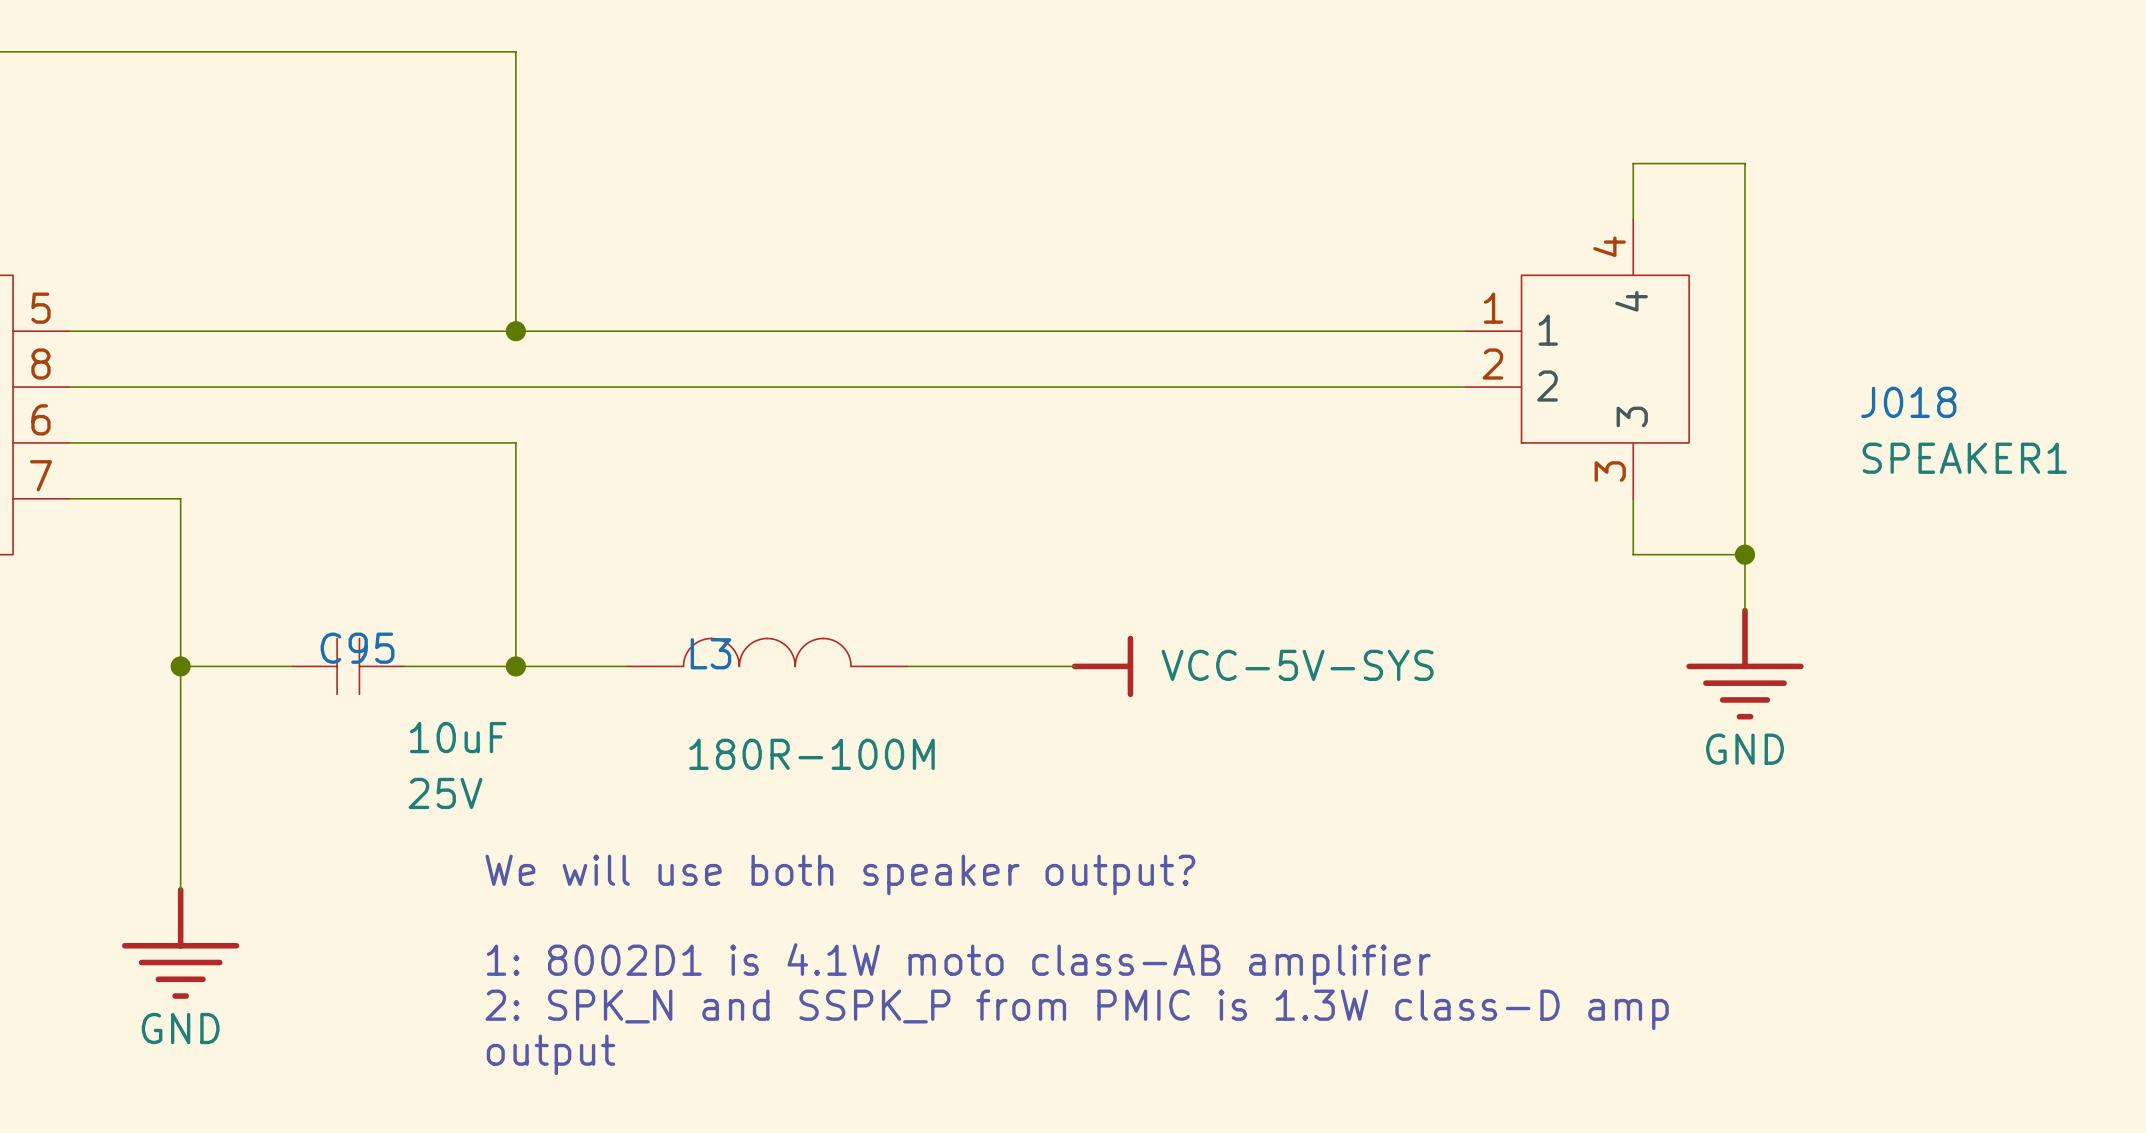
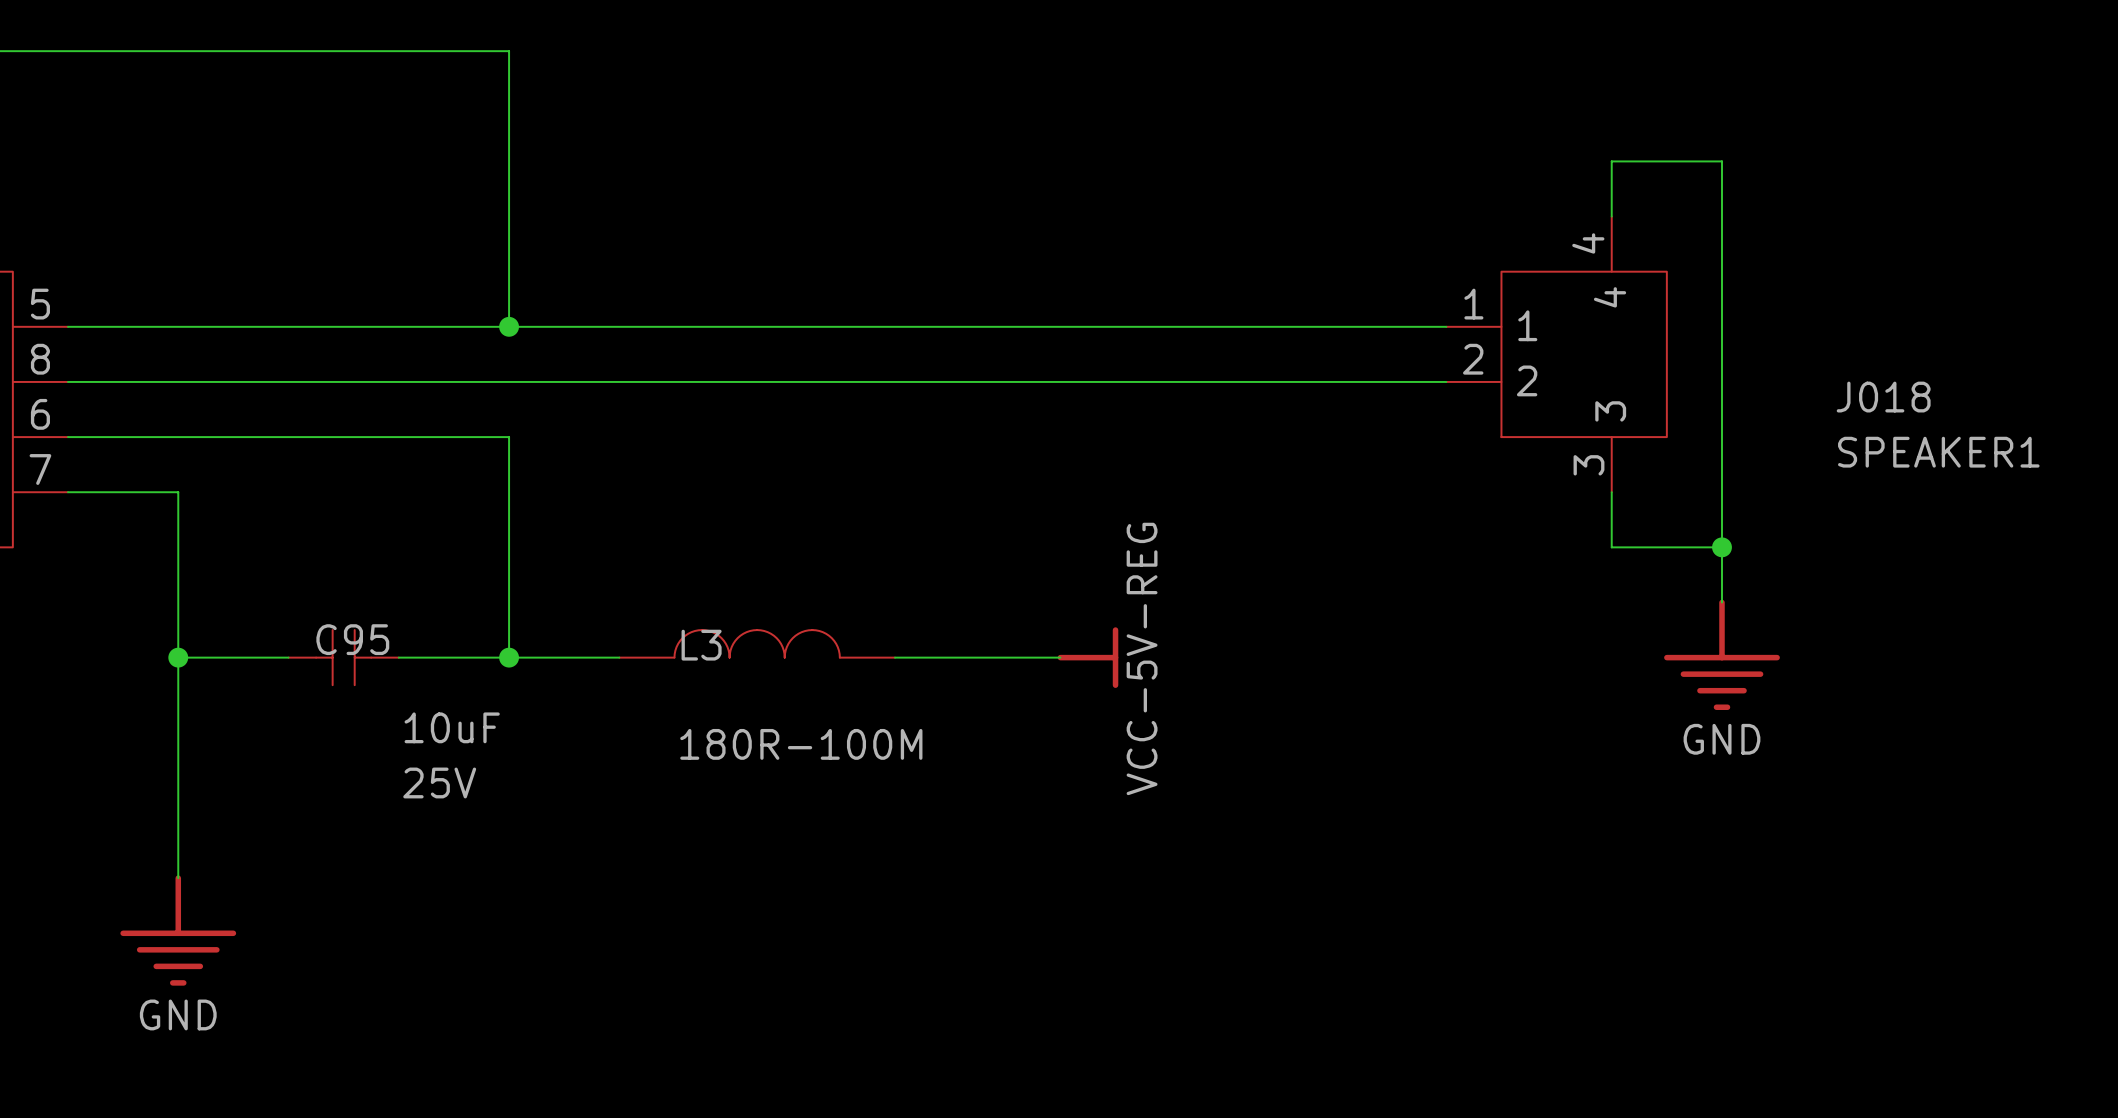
power symbol: VCC-5V-SYS (1102, 666) -> VCC-5V-REG (1087, 657)
text: We will use both speaker output? (840, 874) -> none
text: 1: 8002D1 is 4.1W moto class-AB amplifier (958, 964) -> none
text: 2: SPK_N and SSPK_P from PMIC is 1.3W class-D amp (1077, 1009) -> none
text: output (550, 1054) -> none

